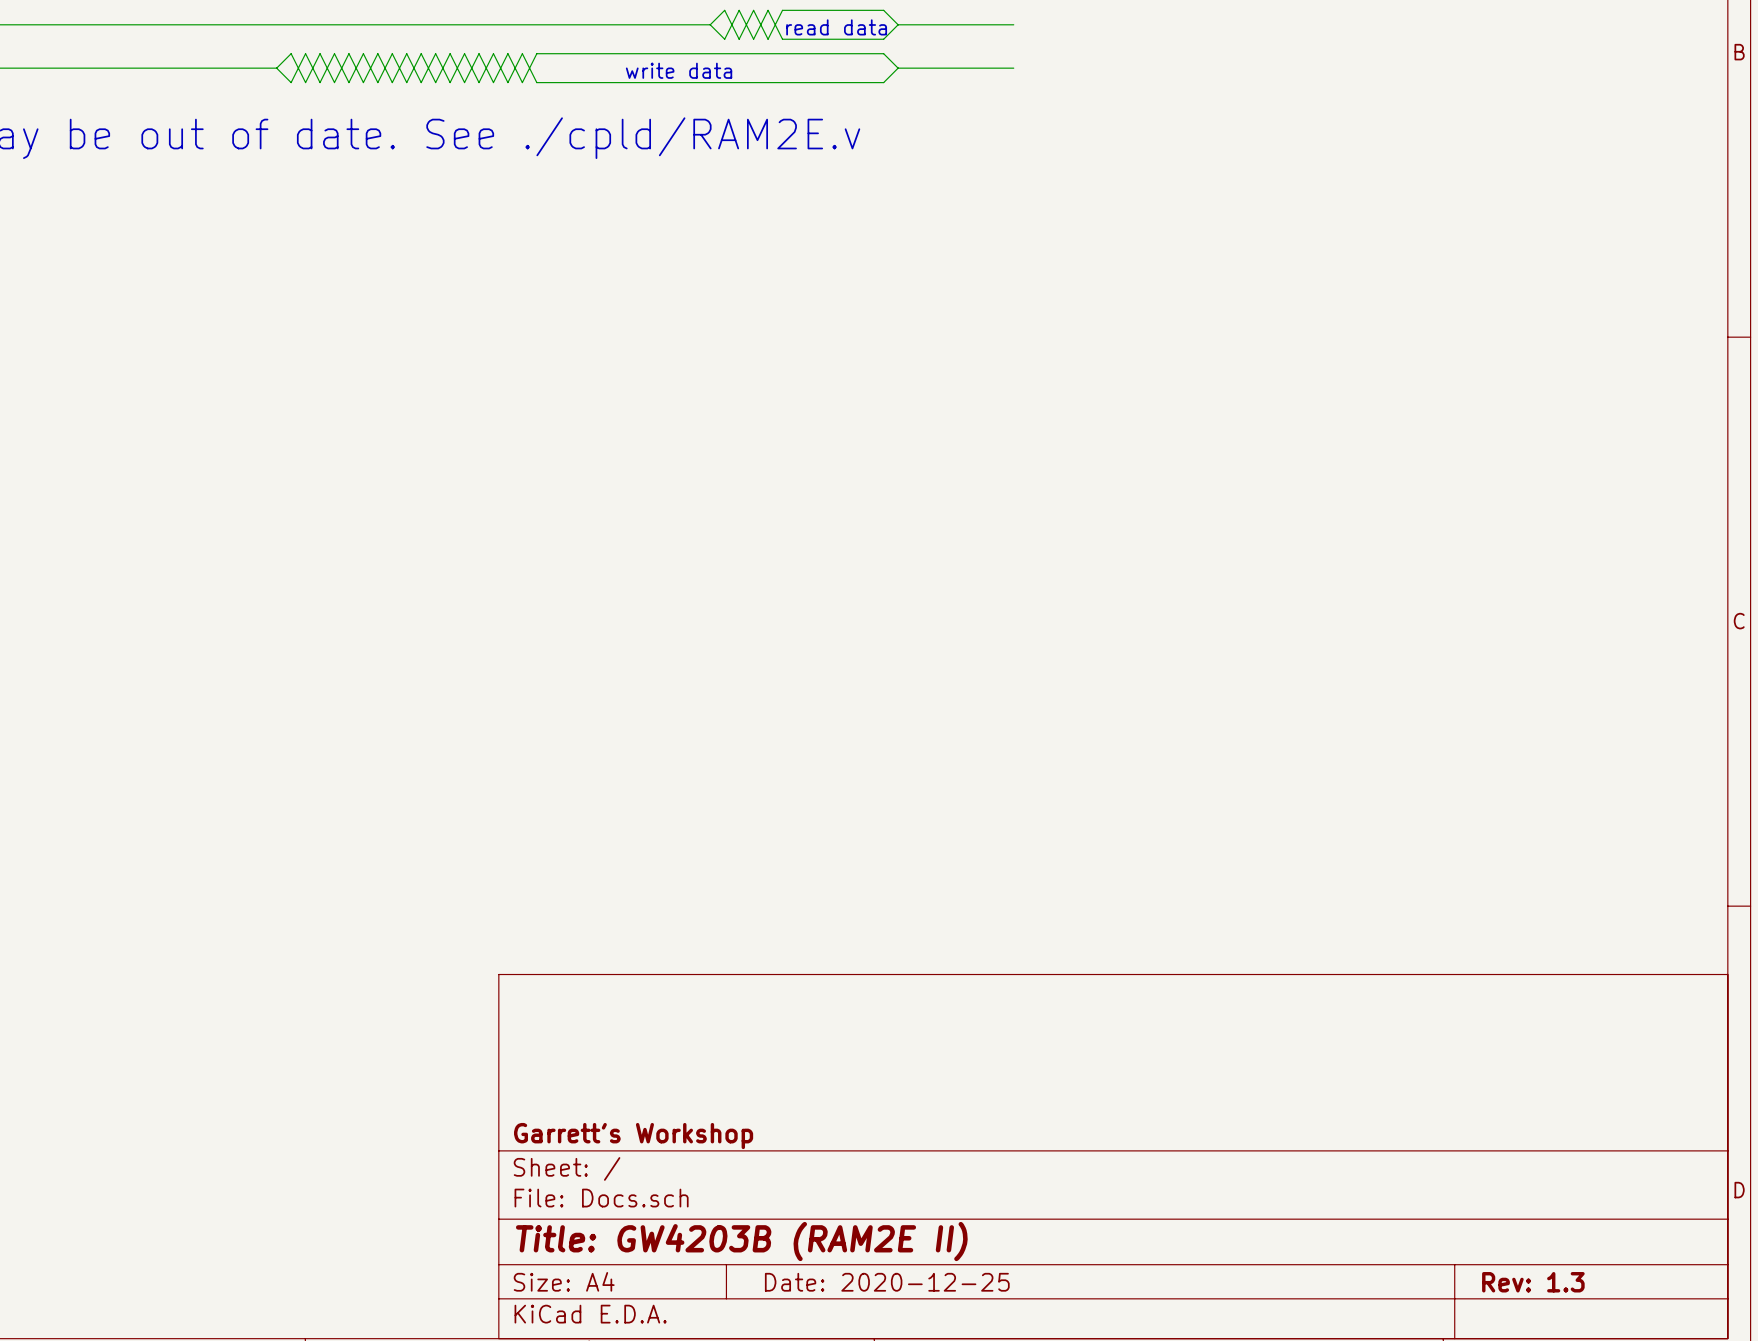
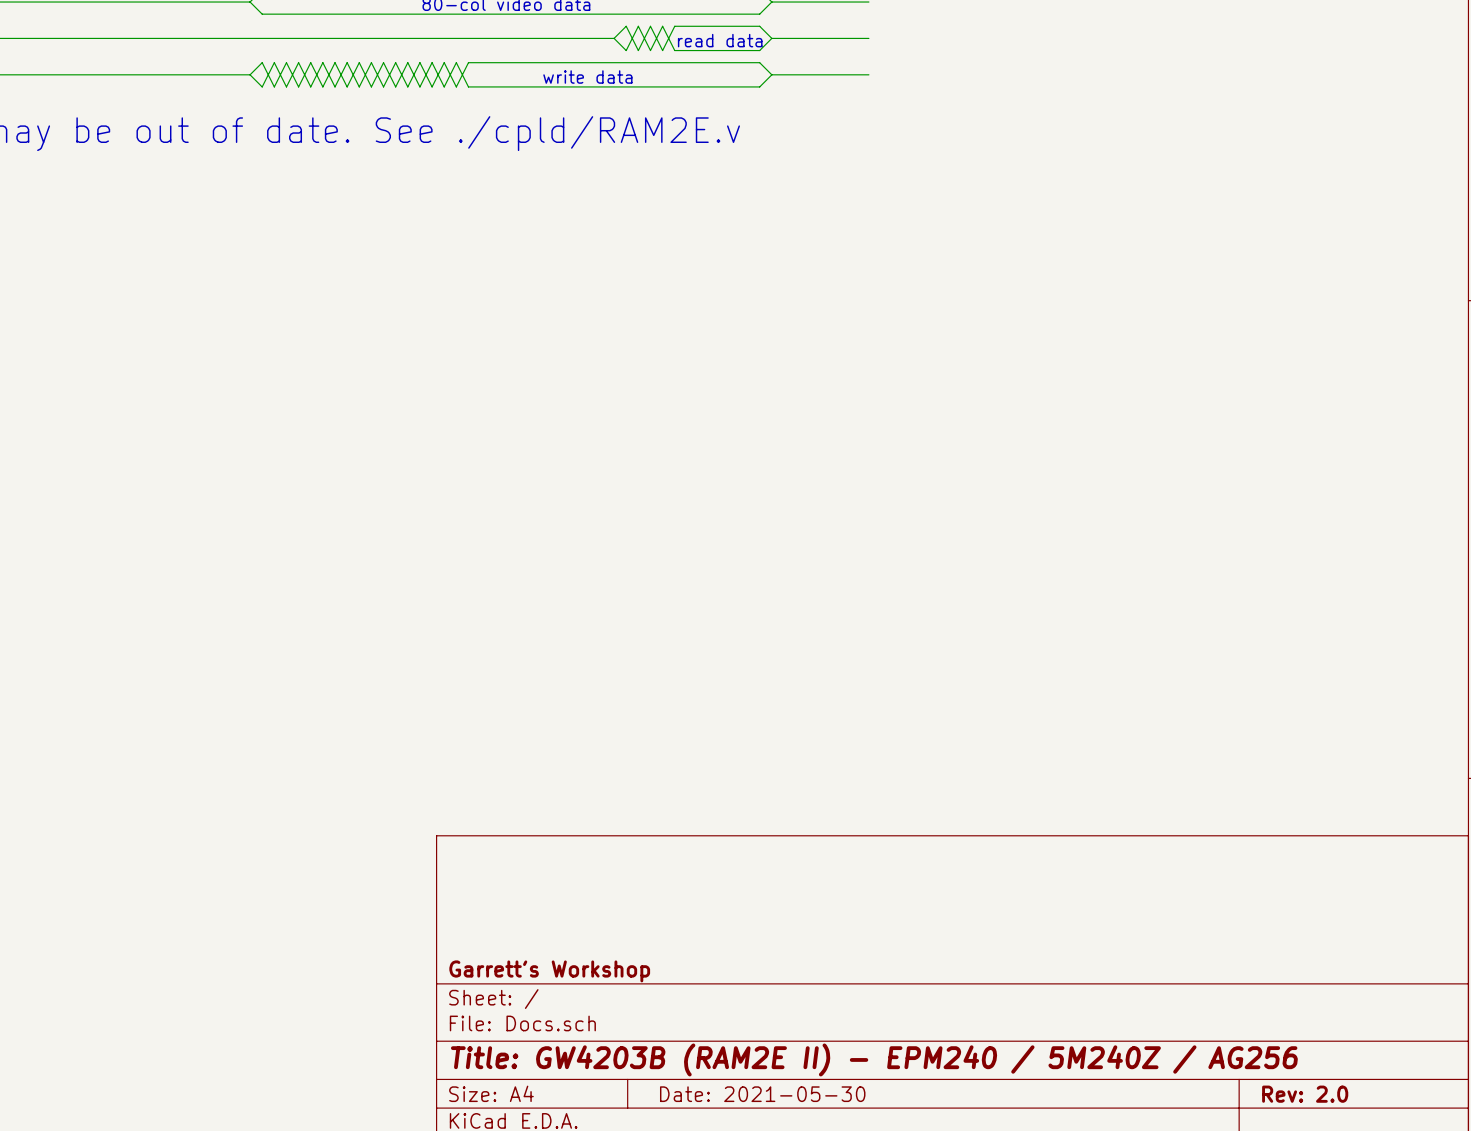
title block: Title: GW4203B (RAM2E II) (741, 1241) -> Title: GW4203B (RAM2E II) - EPM240 / 5M240Z / AG256 (874, 1059)
title block: Date: 2020-12-25 (887, 1282) -> Date: 2021-05-30 (762, 1094)
title block: Rev: 1.3 (1533, 1282) -> Rev: 2.0 (1305, 1094)

